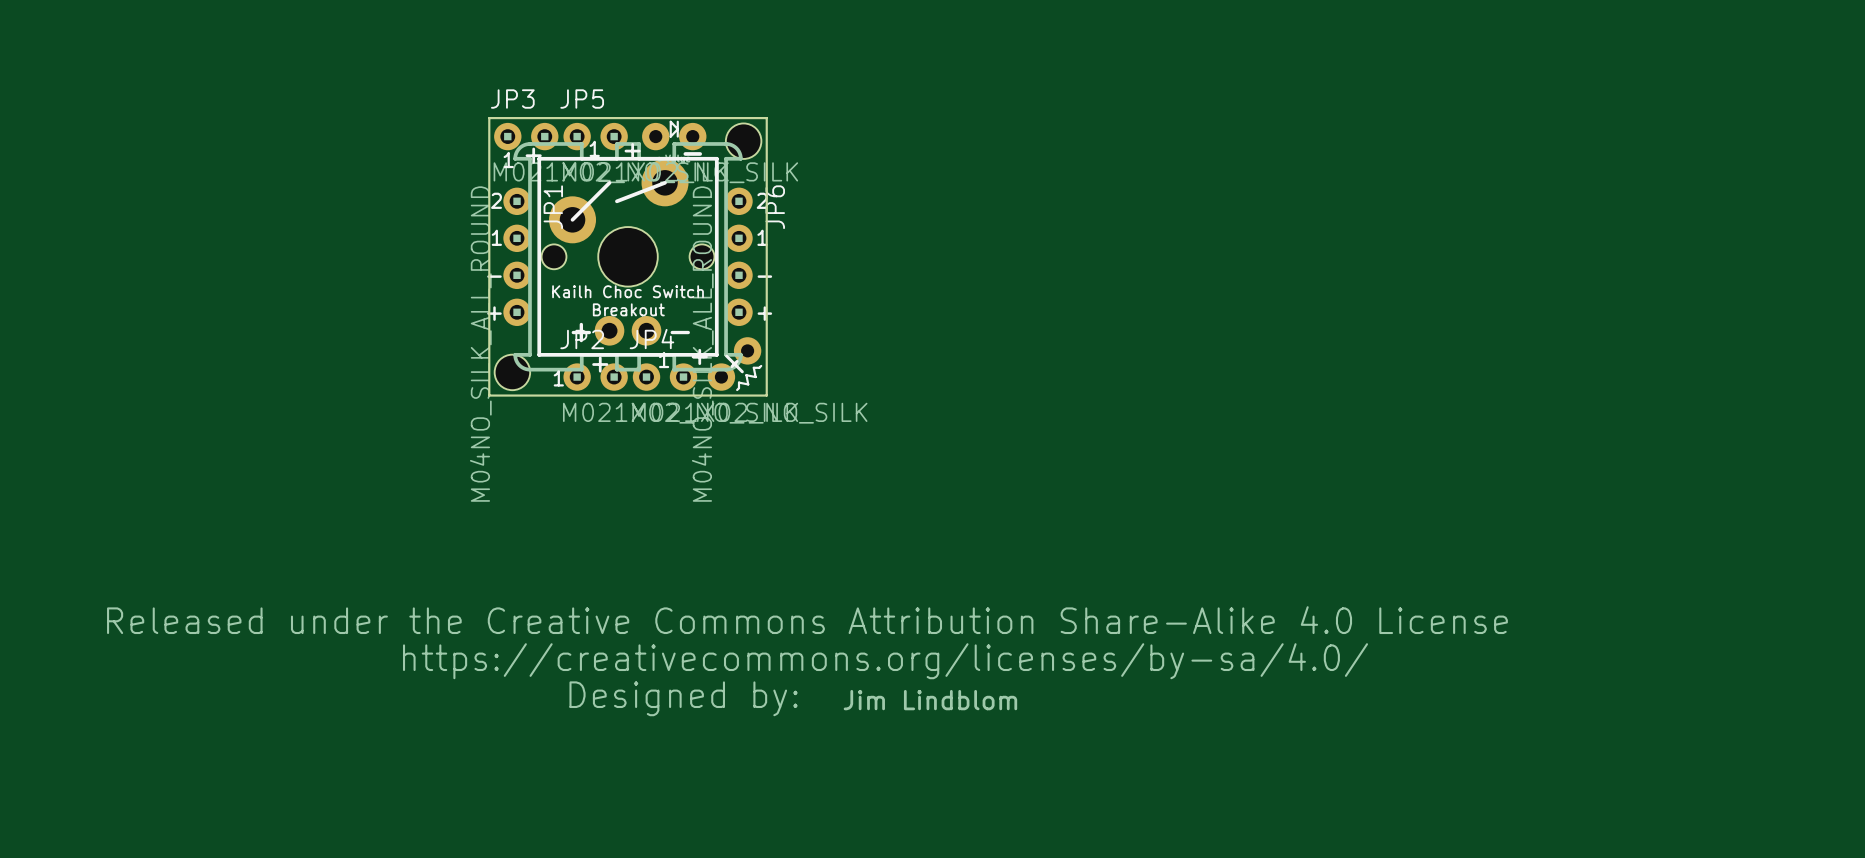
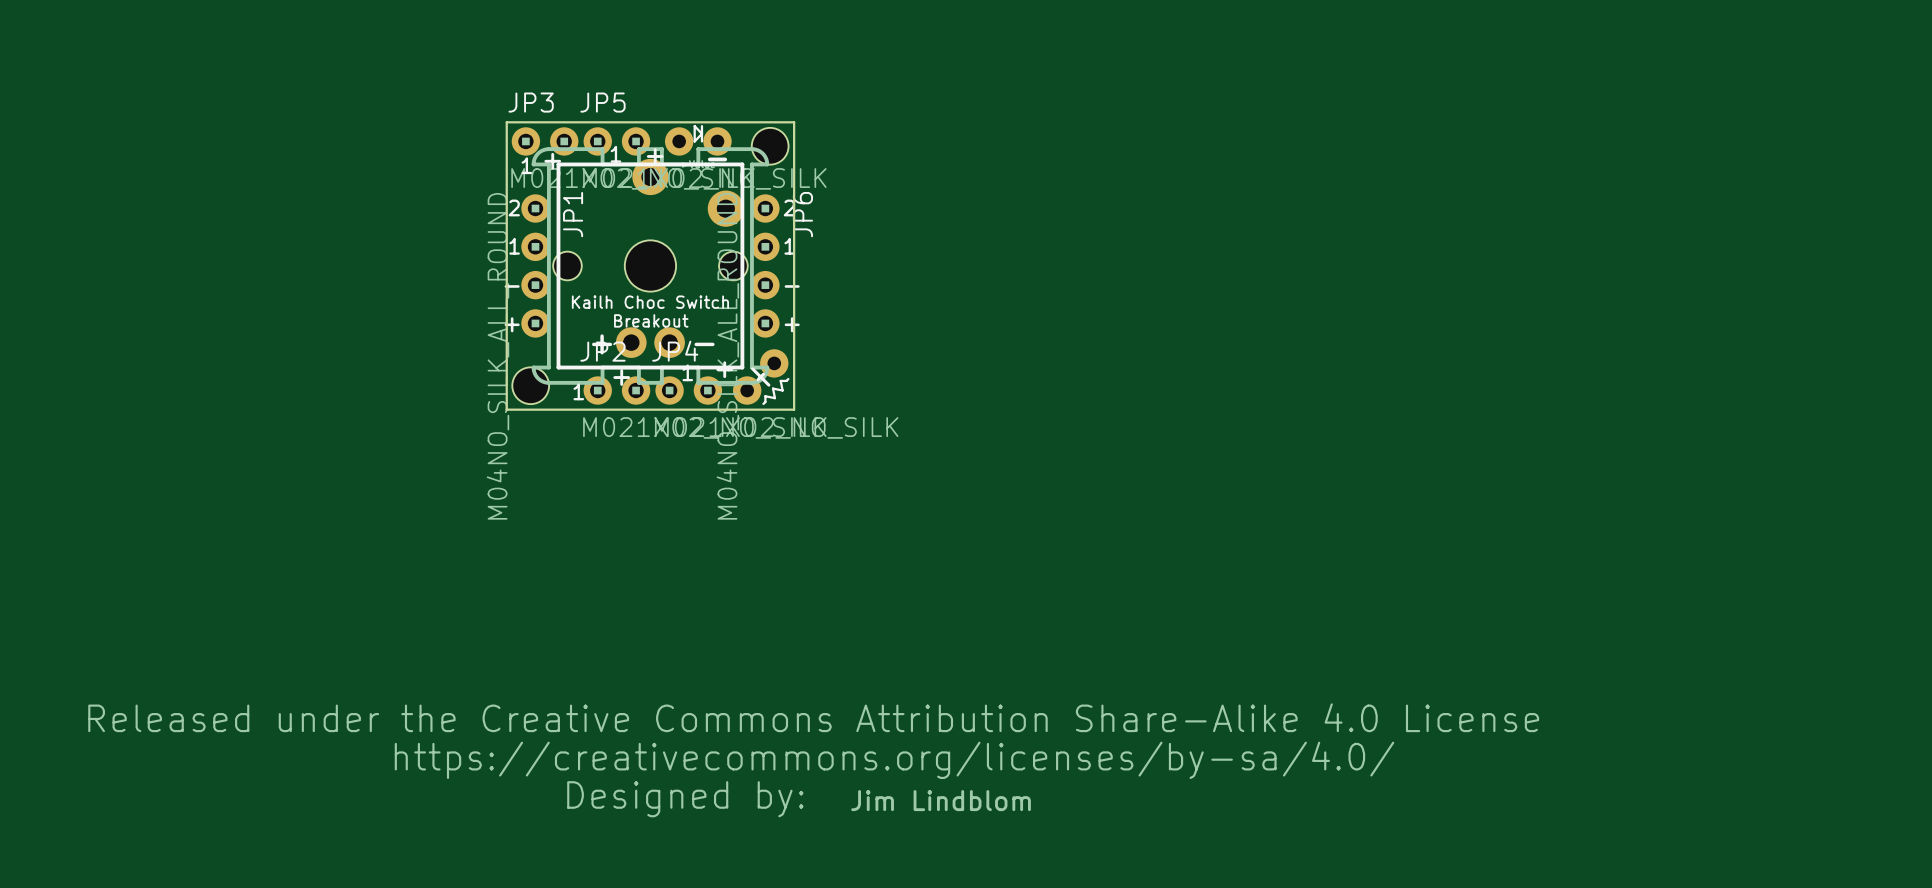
part footprint: [513, 142, 743, 372] -> [531, 147, 770, 385]
drawing position: (807, 661) -> (813, 760)
text position: Jim Lindblom (930, 700) -> Jim Lindblom (941, 800)

